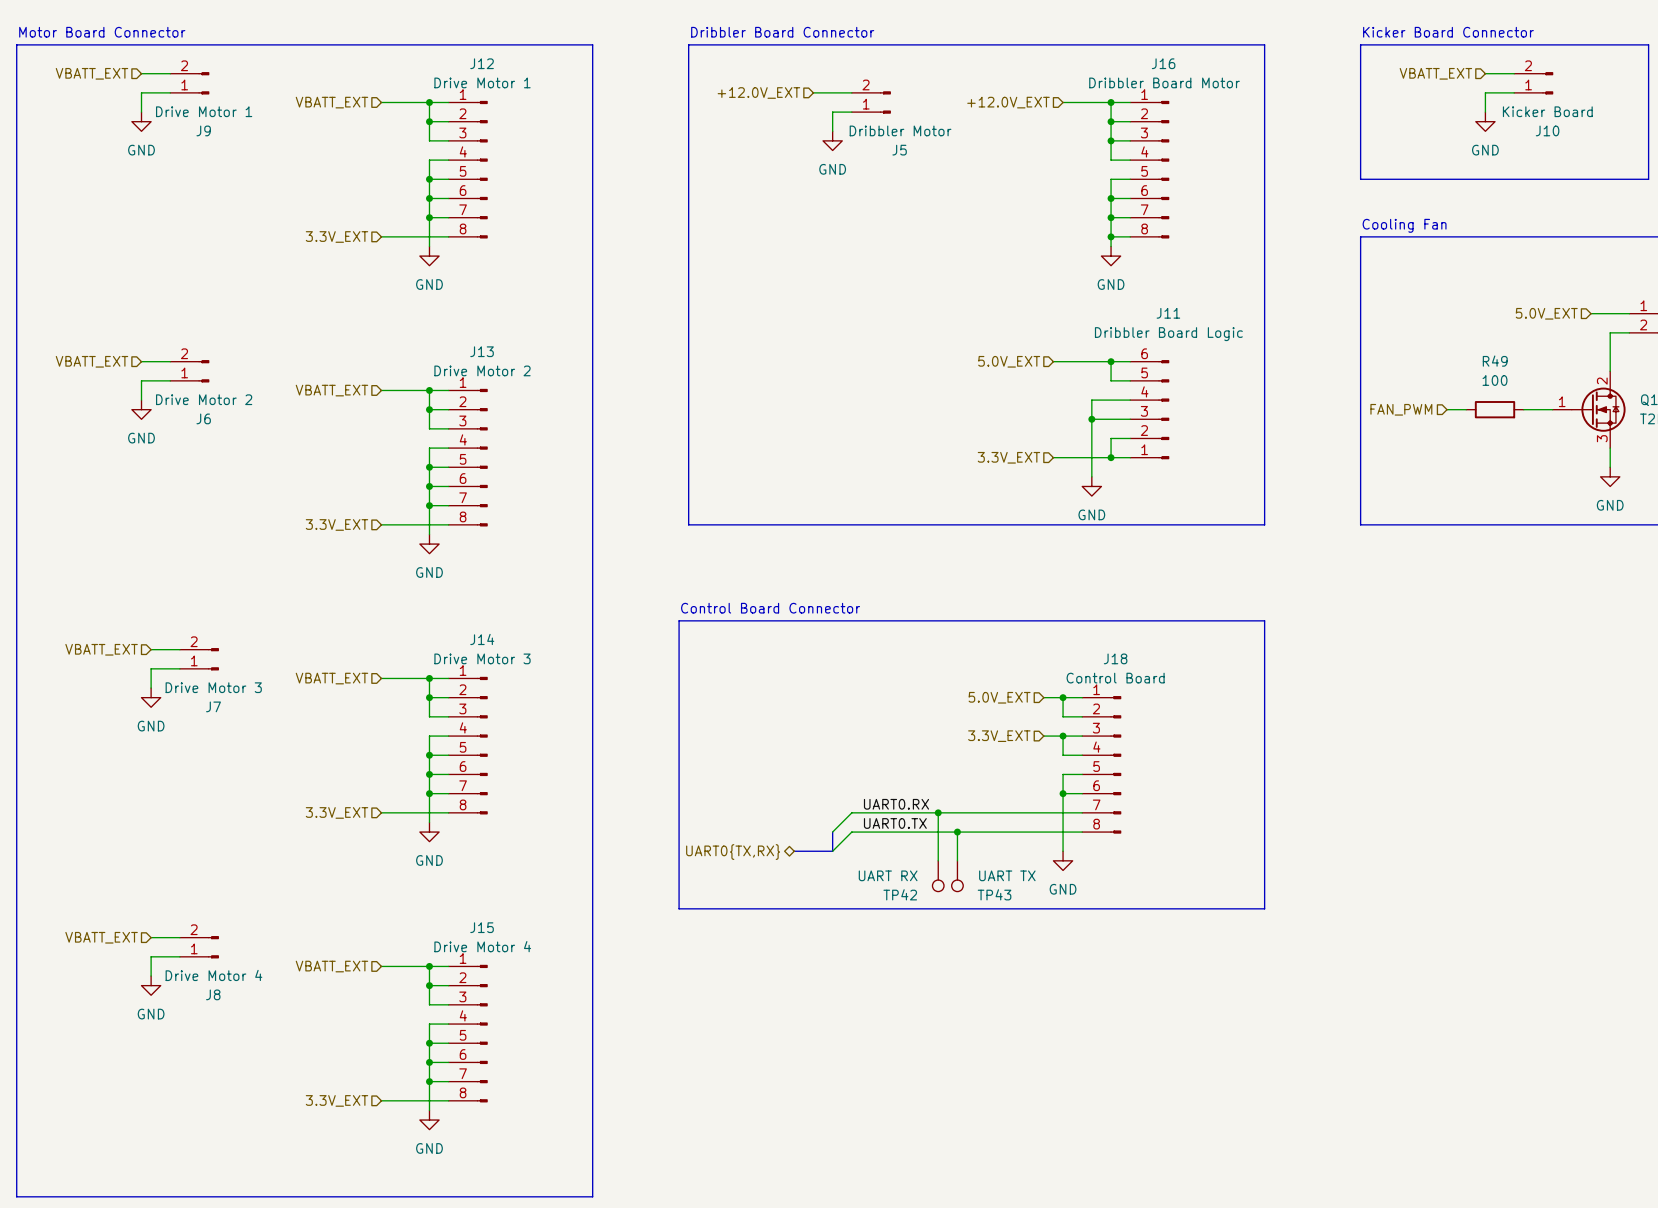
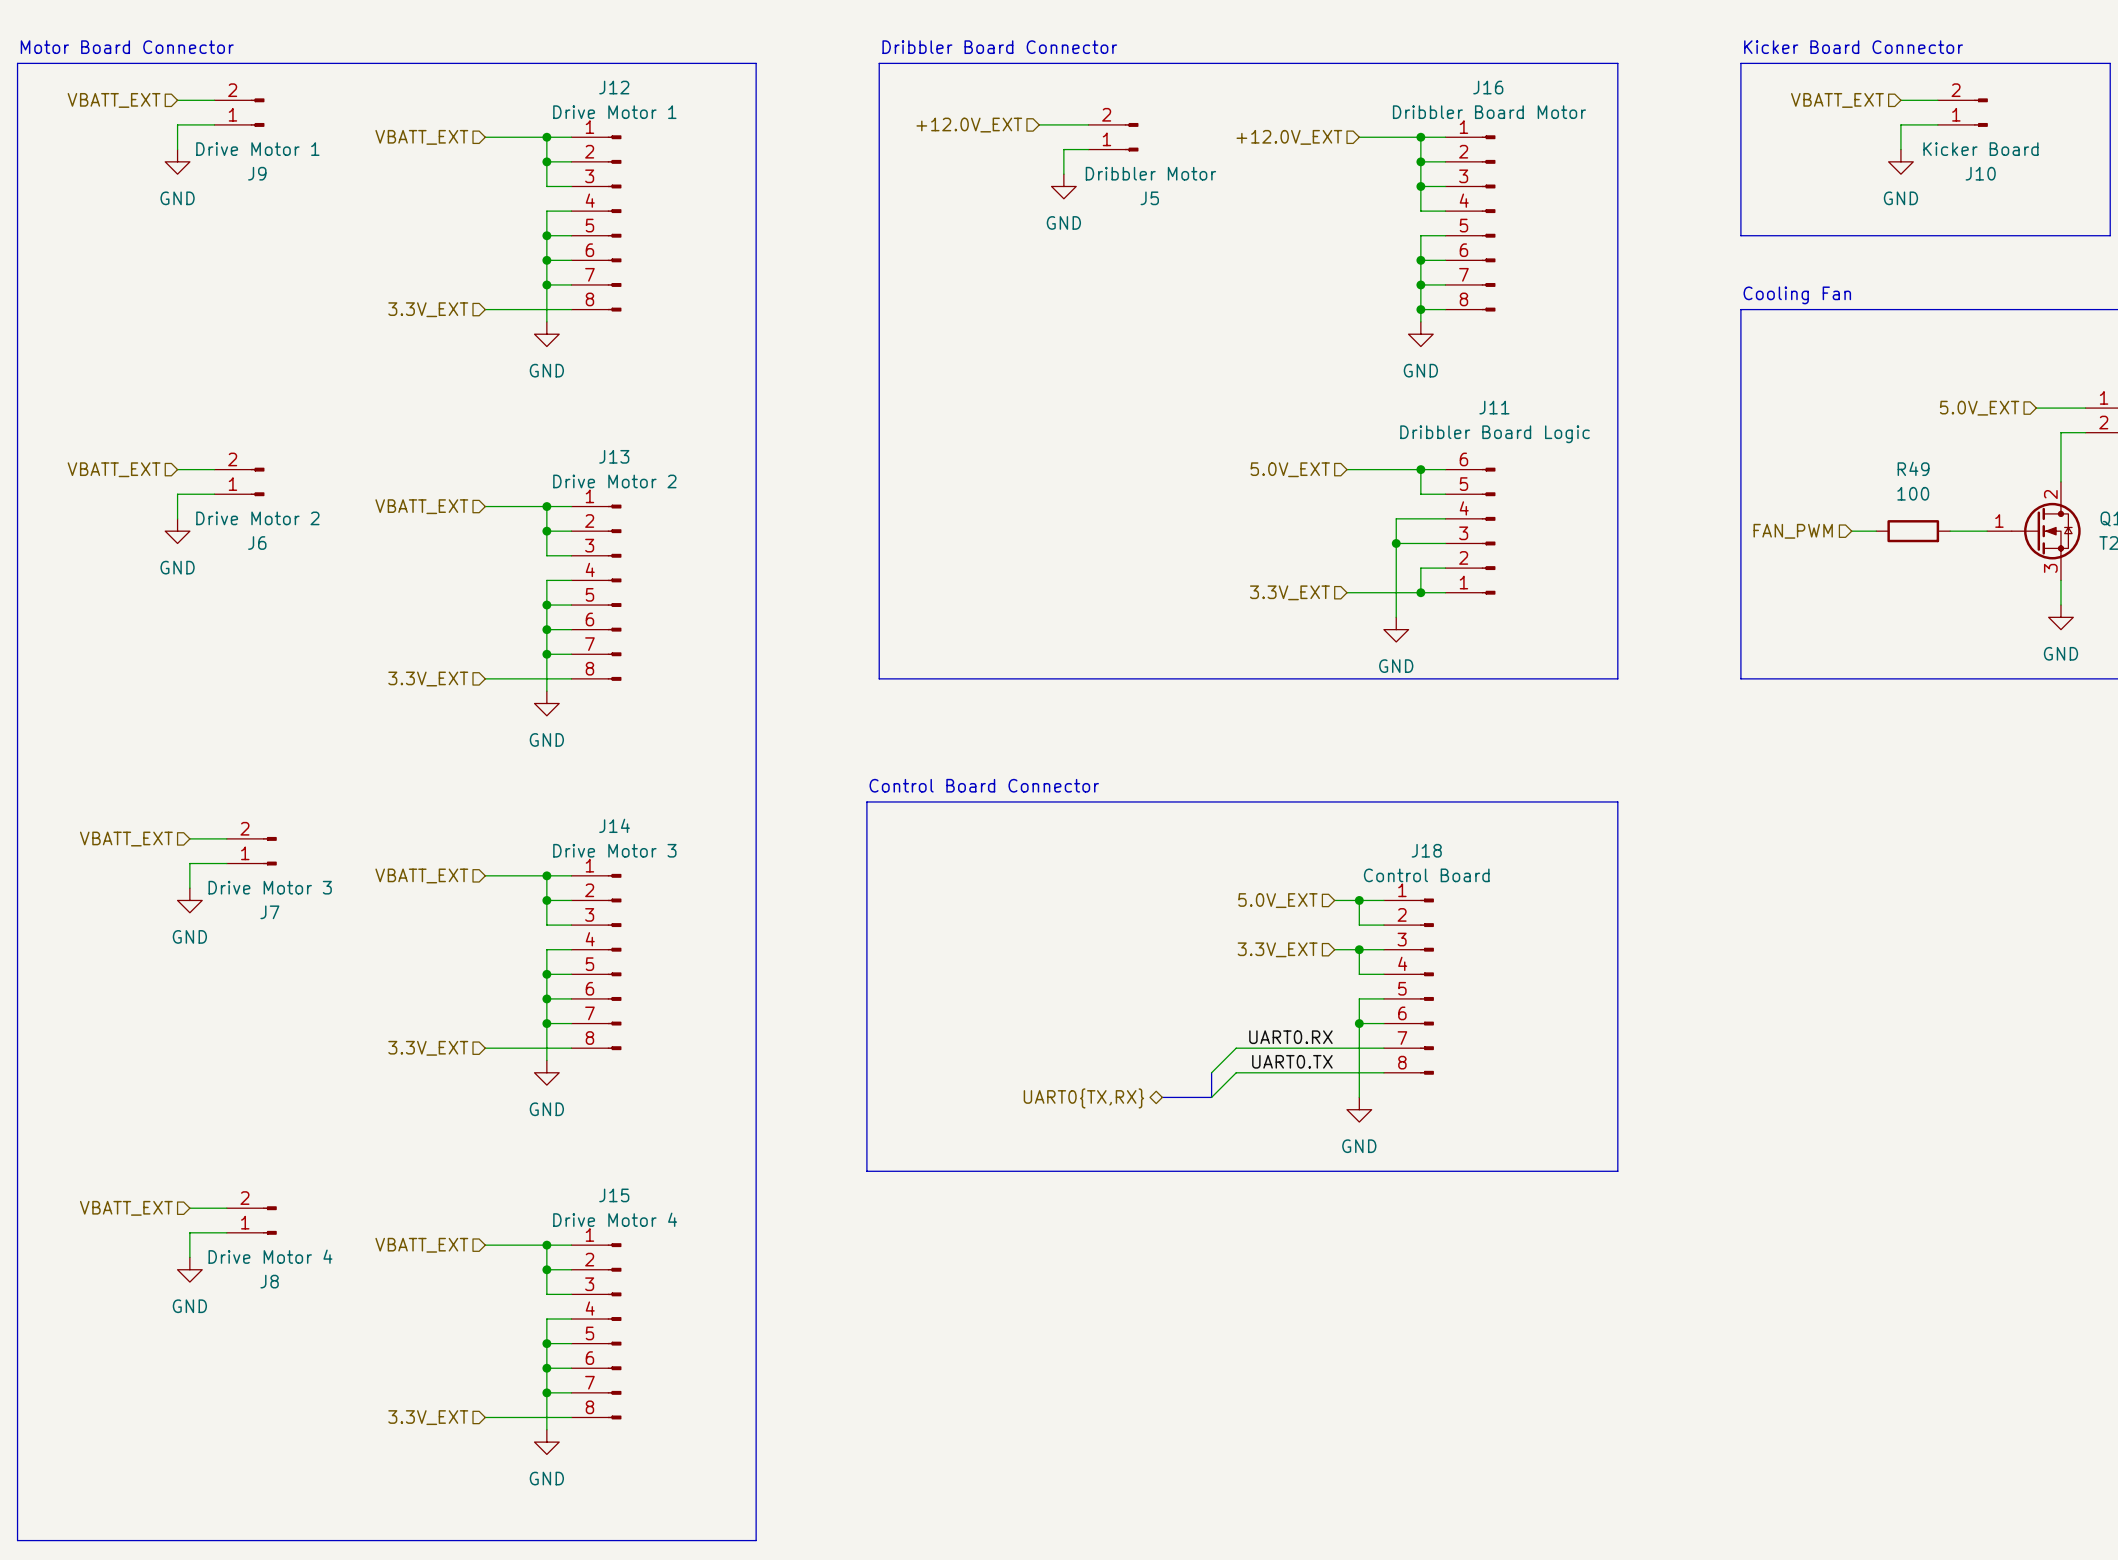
label position: UART0.RX (896, 804) -> UART0.RX (1290, 1037)
wire: (938, 812) (938, 860) -> none
junction: (938, 812) -> none
wire: (967, 812) (851, 812) (832, 832) -> (1236, 1048) (1211, 1072)
label position: UART0.TX (895, 823) -> UART0.TX (1292, 1061)
bus: (832, 832) (832, 851) (794, 851) -> (1211, 1072) (1211, 1097) (1162, 1097)
wire: (957, 832) (957, 860) -> none
junction: (957, 832) -> none
wire: (967, 832) (851, 832) (832, 851) -> (1236, 1072) (1211, 1097)
hierarchical label position: UART0{TX,RX} (733, 852) -> UART0{TX,RX} (1083, 1098)
TP42: UART RX (938, 876) -> none
TP43: UART TX (957, 876) -> none

